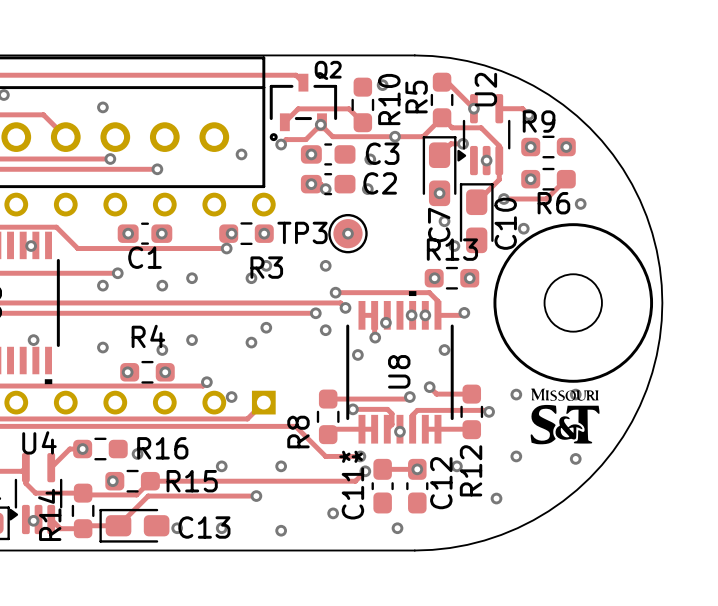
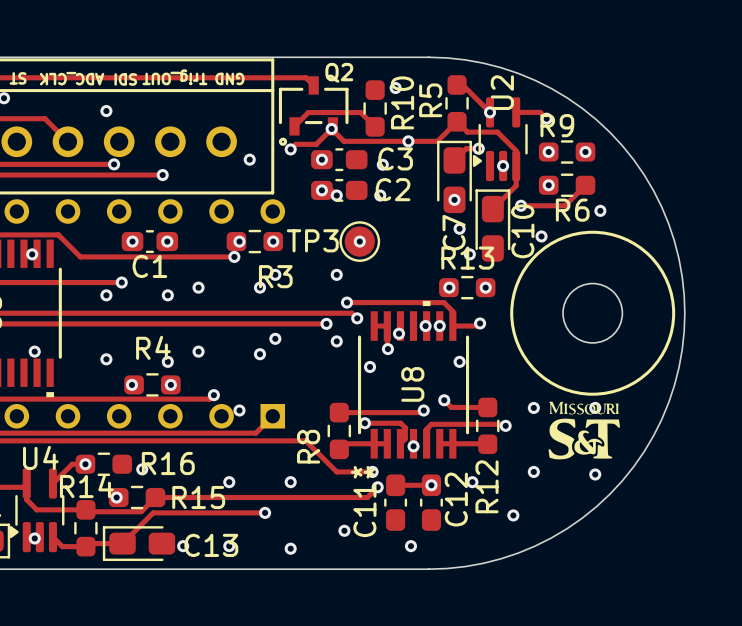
text: none -> Trig_OUT (174, 77)
text: none -> ST (18, 78)
text: none -> ADC_CLK (72, 78)
text: none -> SDI (125, 79)
text: none -> GND (229, 78)
R14 name rotation: 0° (49, 514) -> 90° clockwise (86, 486)

